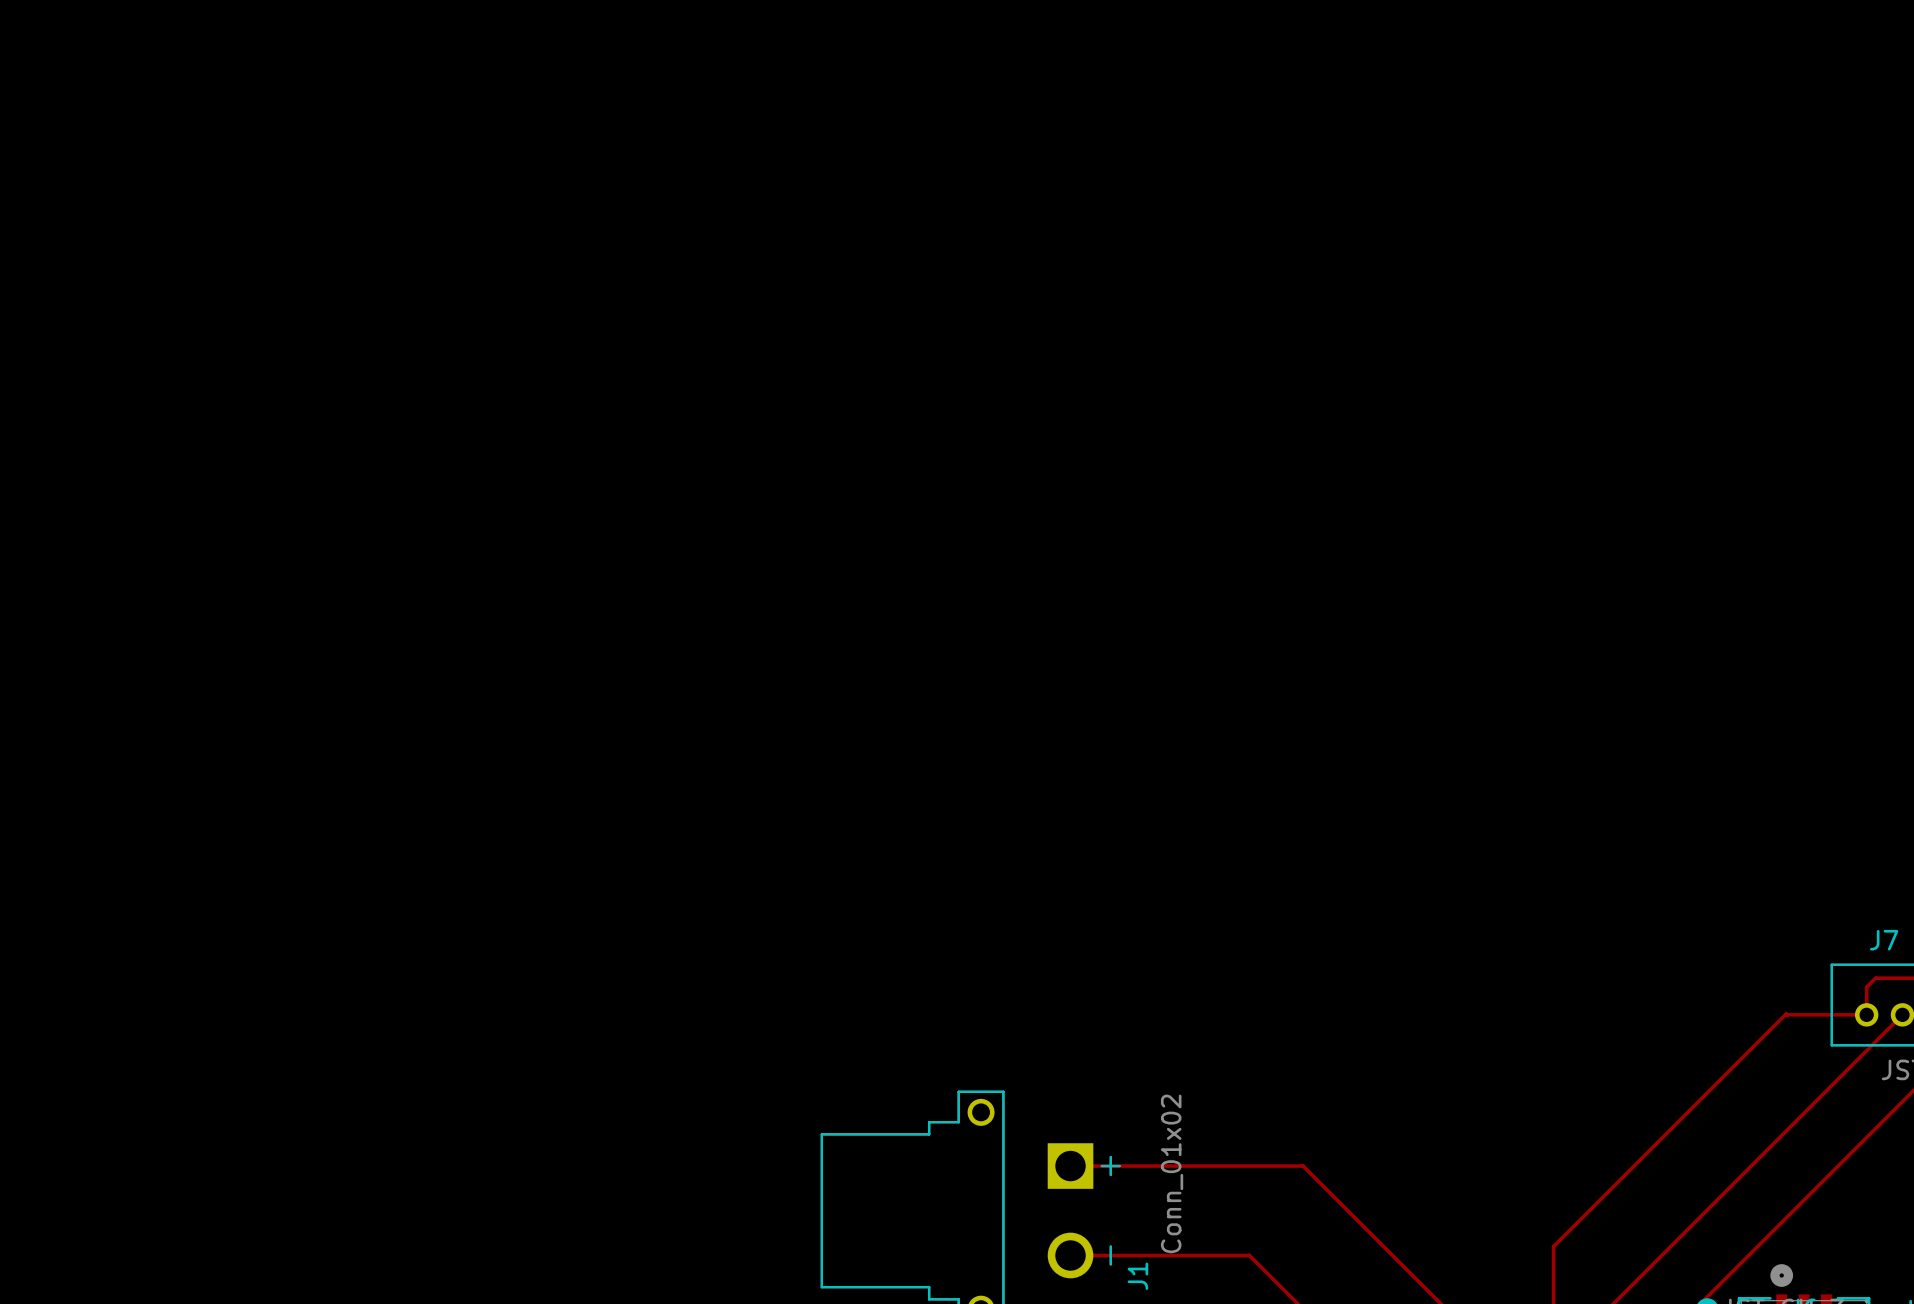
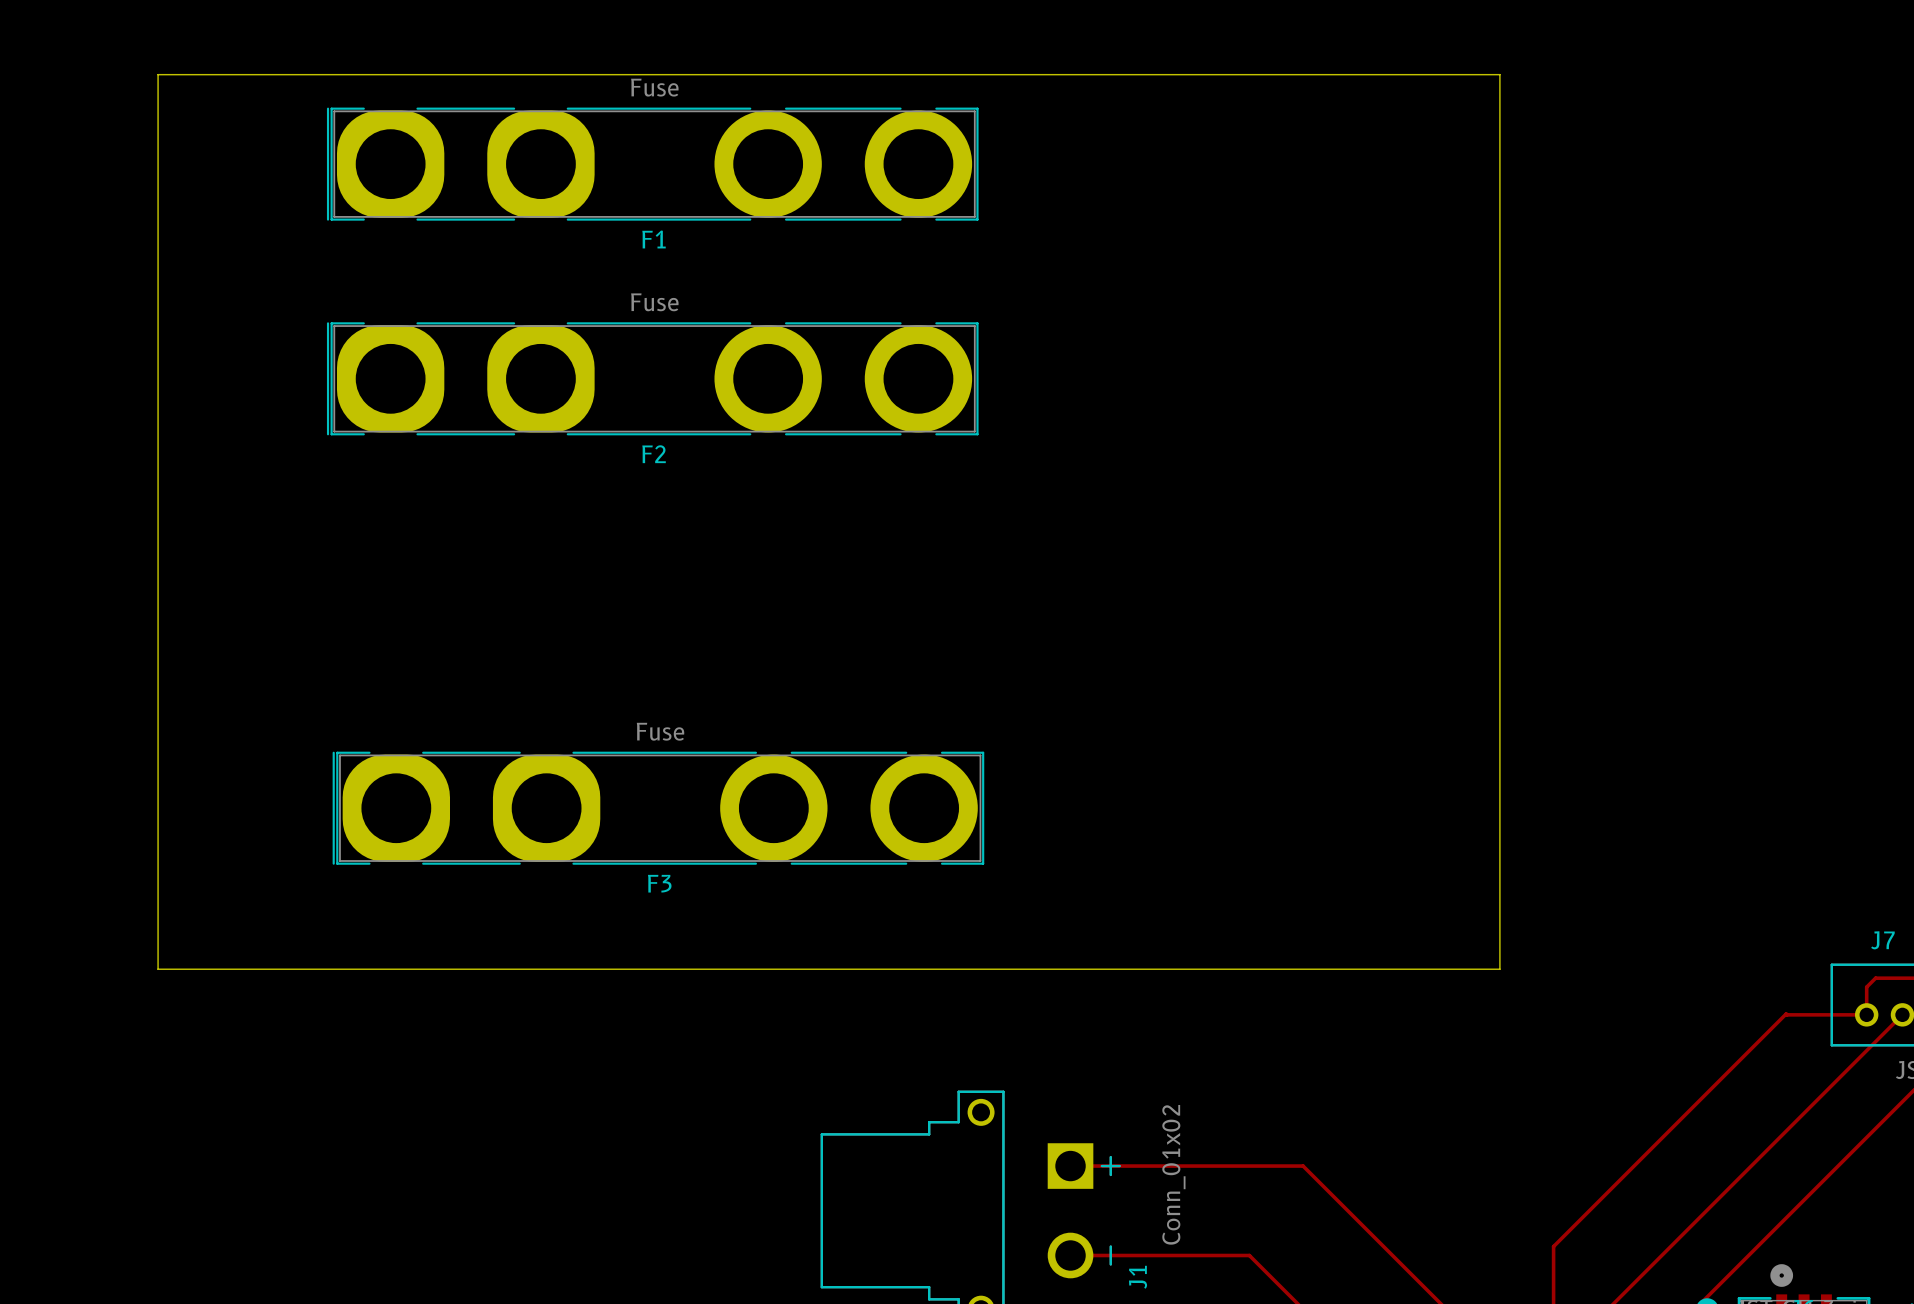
board edge: none -> (158, 74) (1499, 74) (1499, 969) (158, 969) (158, 74)
F1: none -> Fuse (652, 164)
F2: none -> Fuse (652, 378)
F3: none -> Fuse (658, 808)

